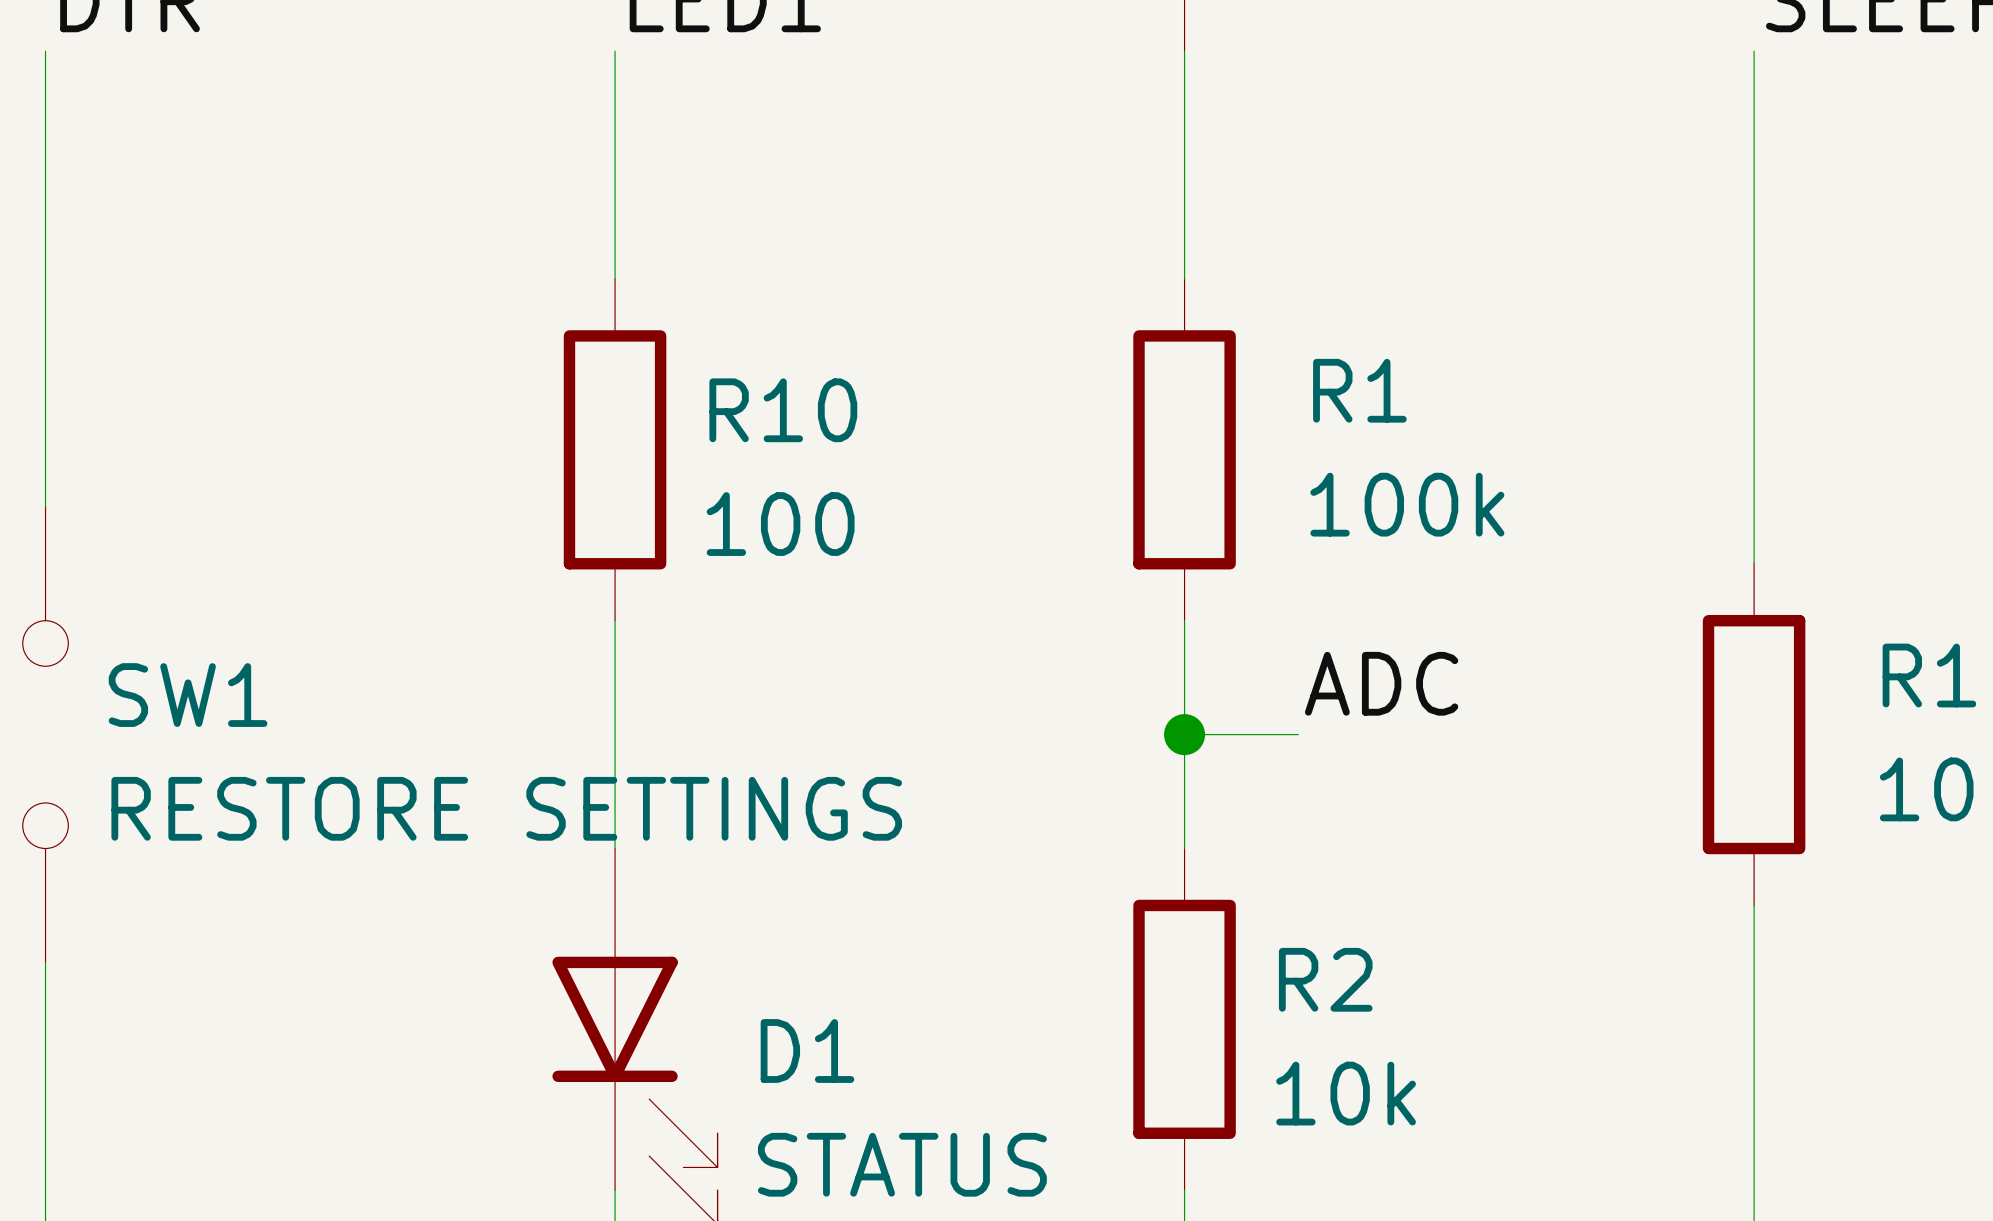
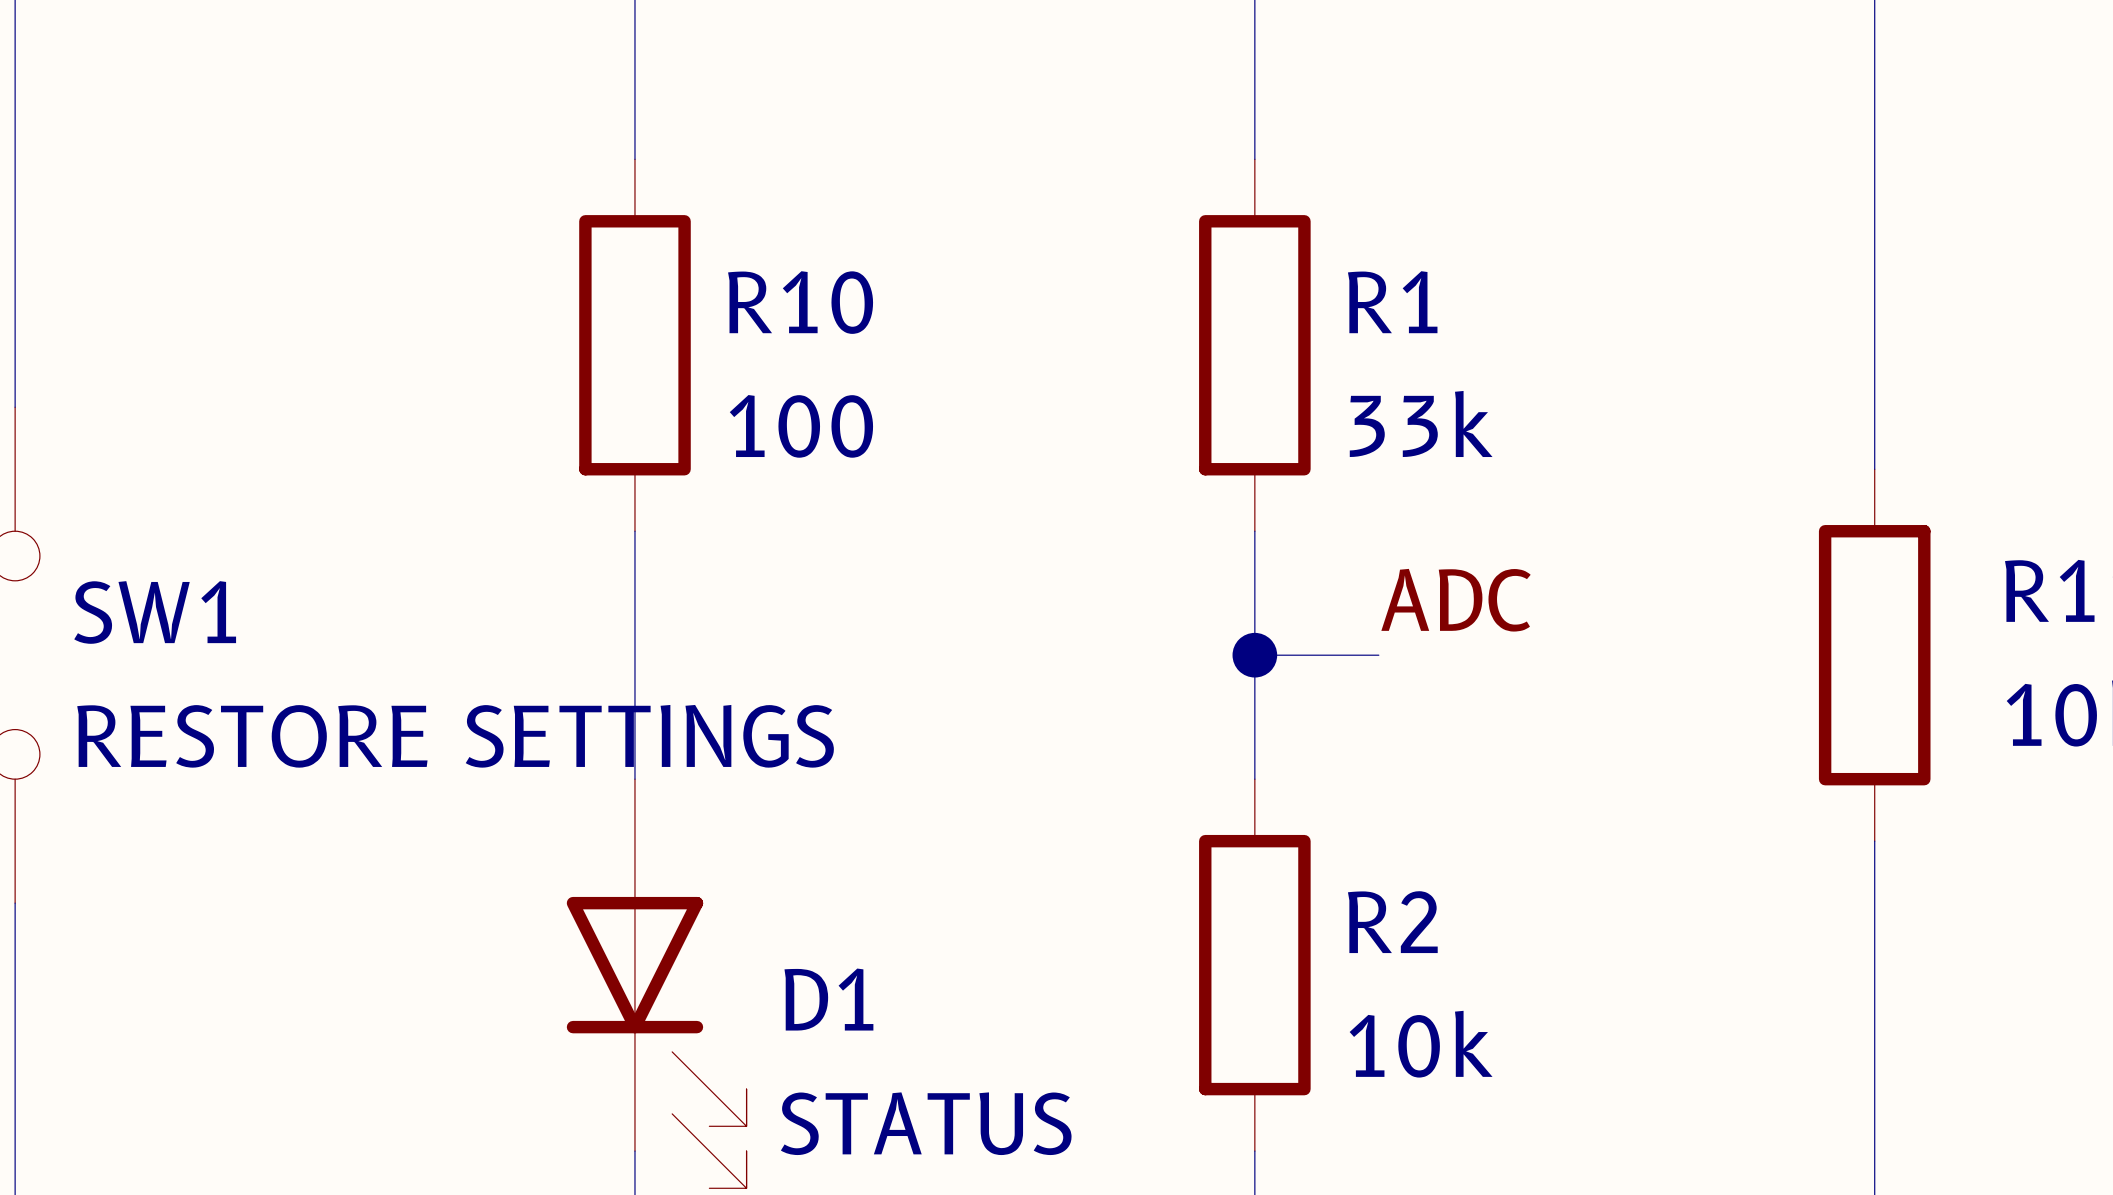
R1 name position: R1 (1359, 390) -> R1 (1392, 302)
R1 value: 100k (1407, 504) -> 33k (1421, 423)

